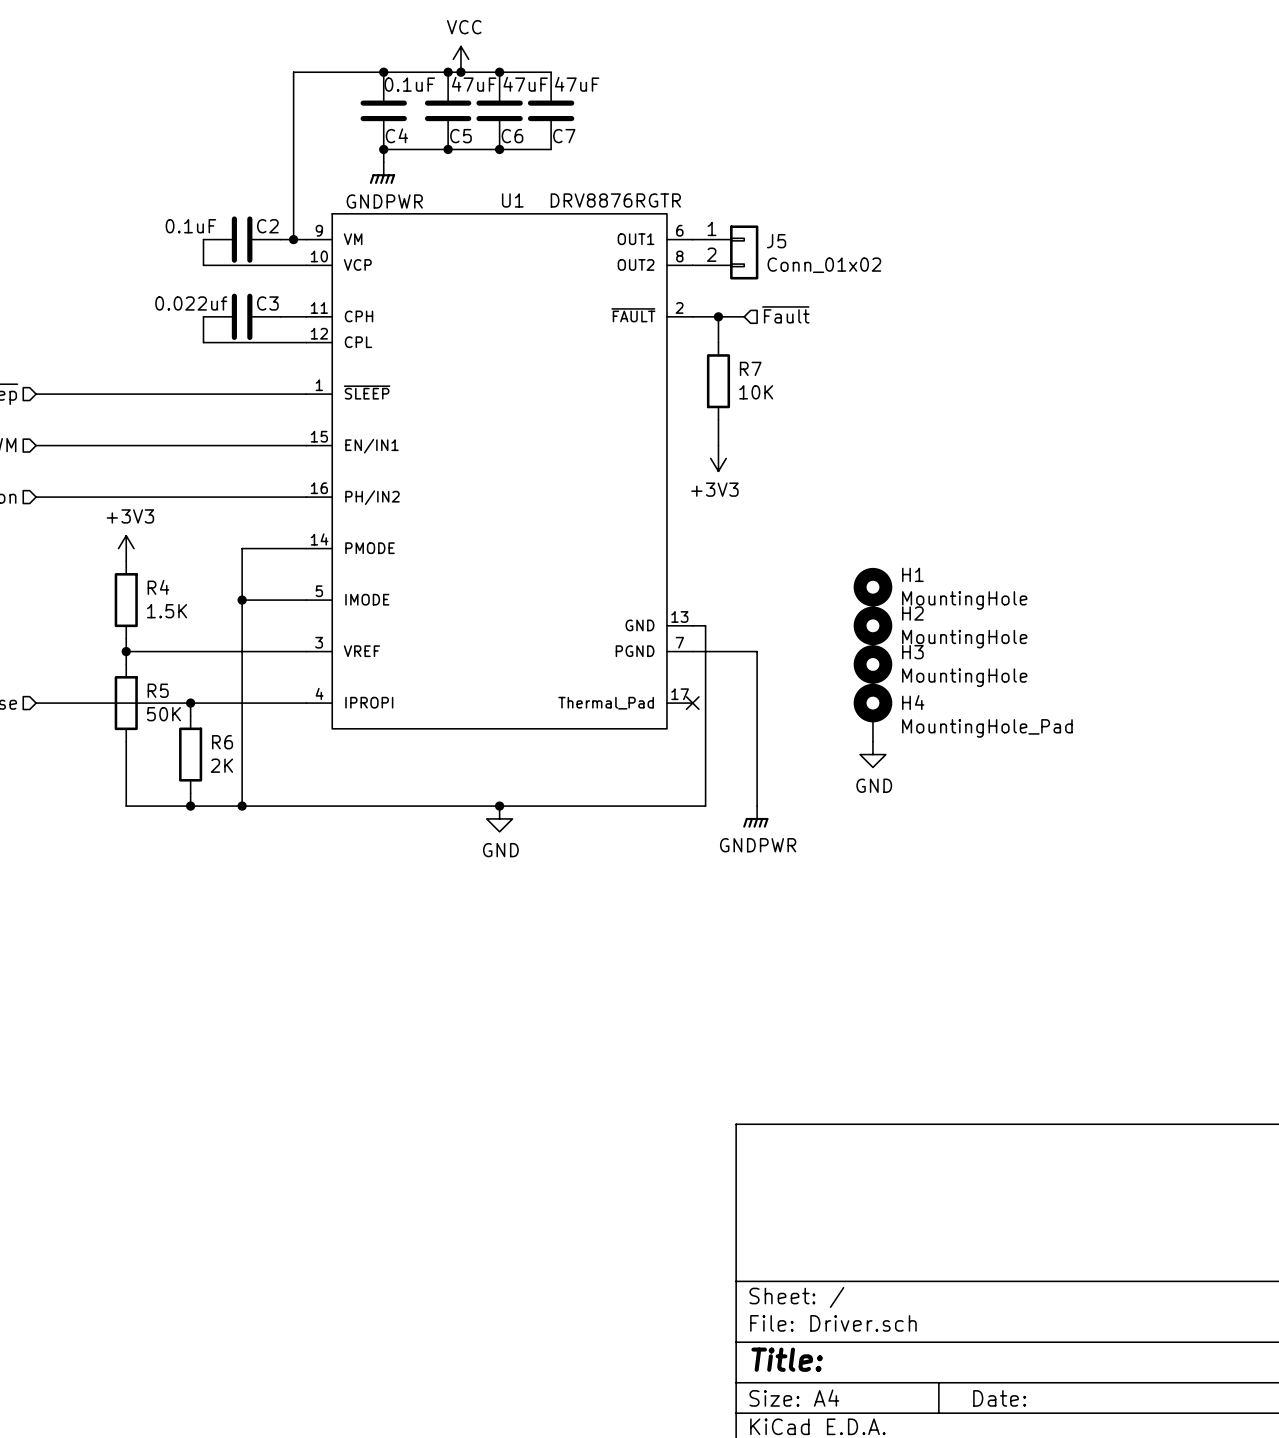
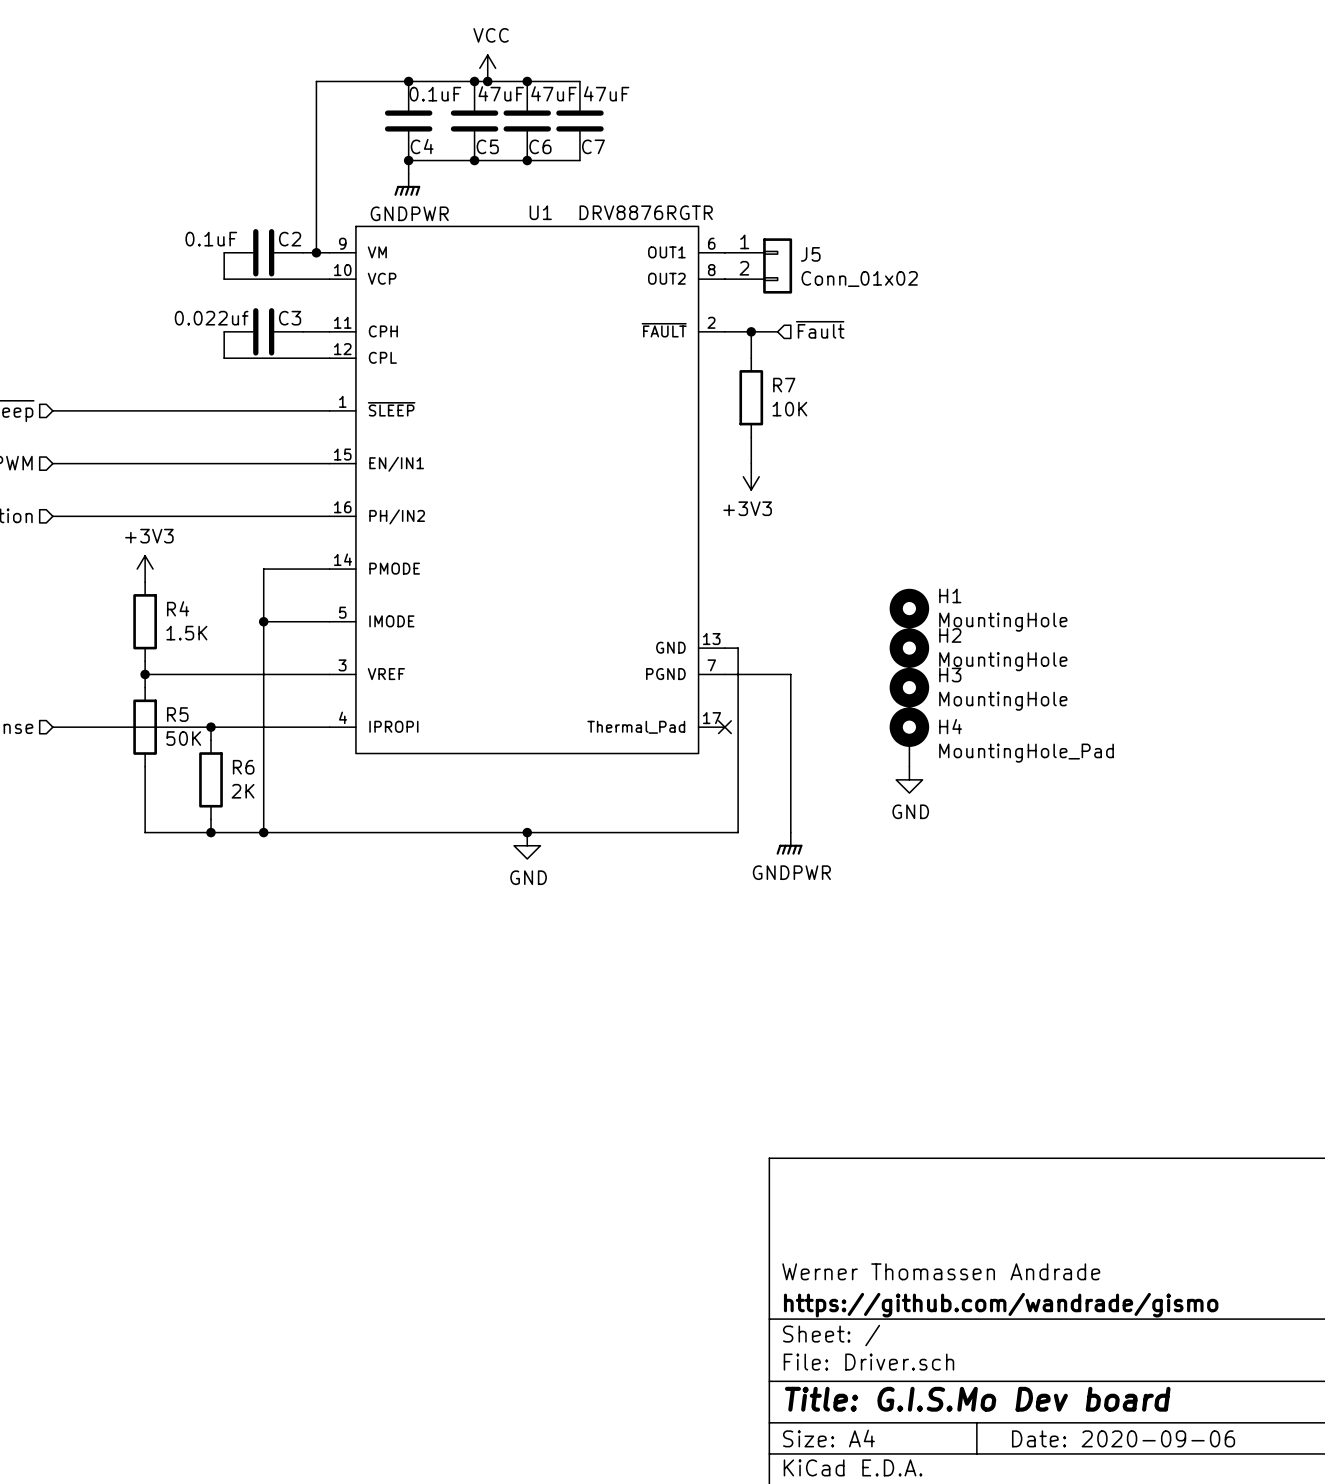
title block: none -> Werner Thomassen Andrade (941, 1271)
title block: none -> https://github.com/wandrade/gismo (1001, 1305)
title block: Title: (787, 1359) -> Title: G.I.S.Mo Dev board (977, 1399)
title block: Date: (999, 1398) -> Date: 2020-09-06 (1123, 1438)

